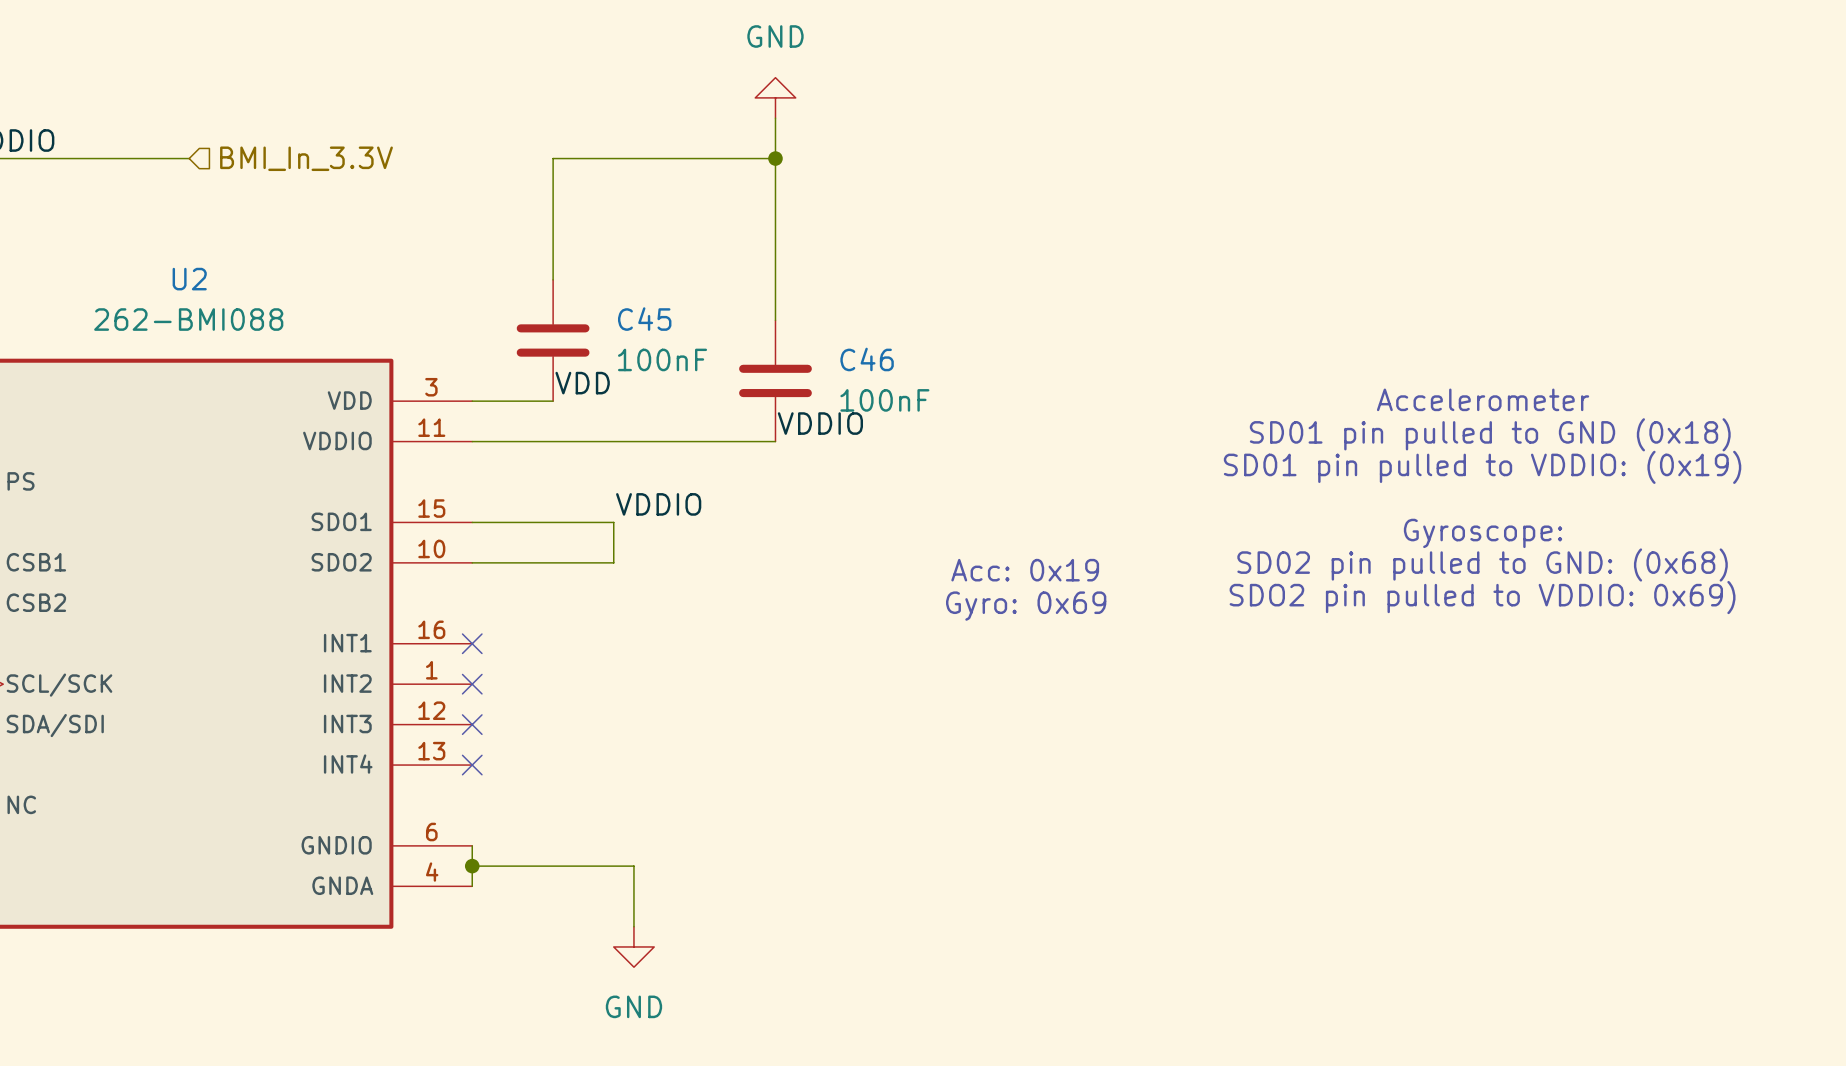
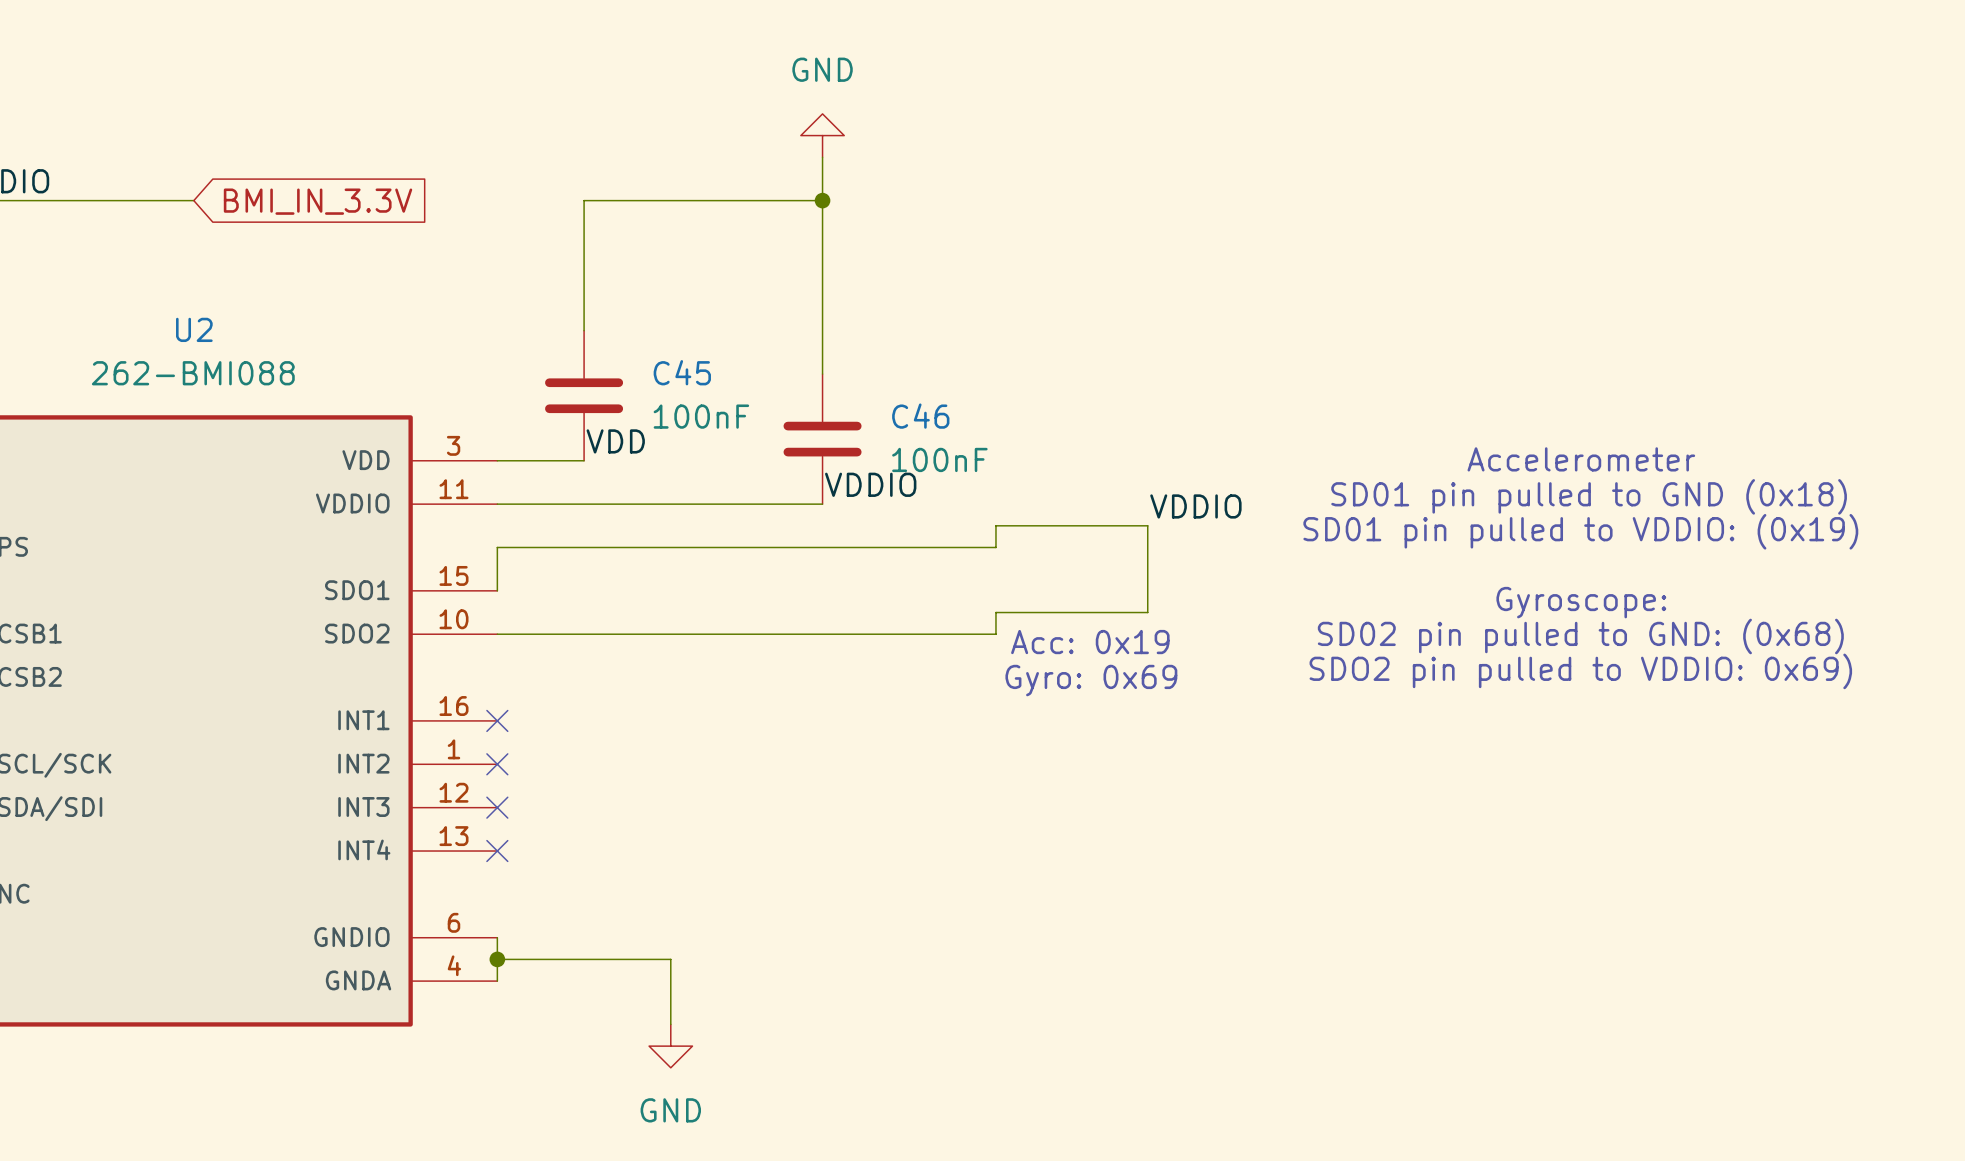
hierarchical label: BMI_In_3.3V (306, 158) -> none
global label: none -> BMI_IN_3.3V (318, 201)
label: none -> VDDIO (1195, 506)
label: VDDIO (658, 504) -> none
wire: (472, 522) (613, 522) (613, 562) -> (497, 590) (497, 547) (995, 547) (995, 525) (1147, 525) (1147, 612) (995, 612) (995, 634) (649, 634)

